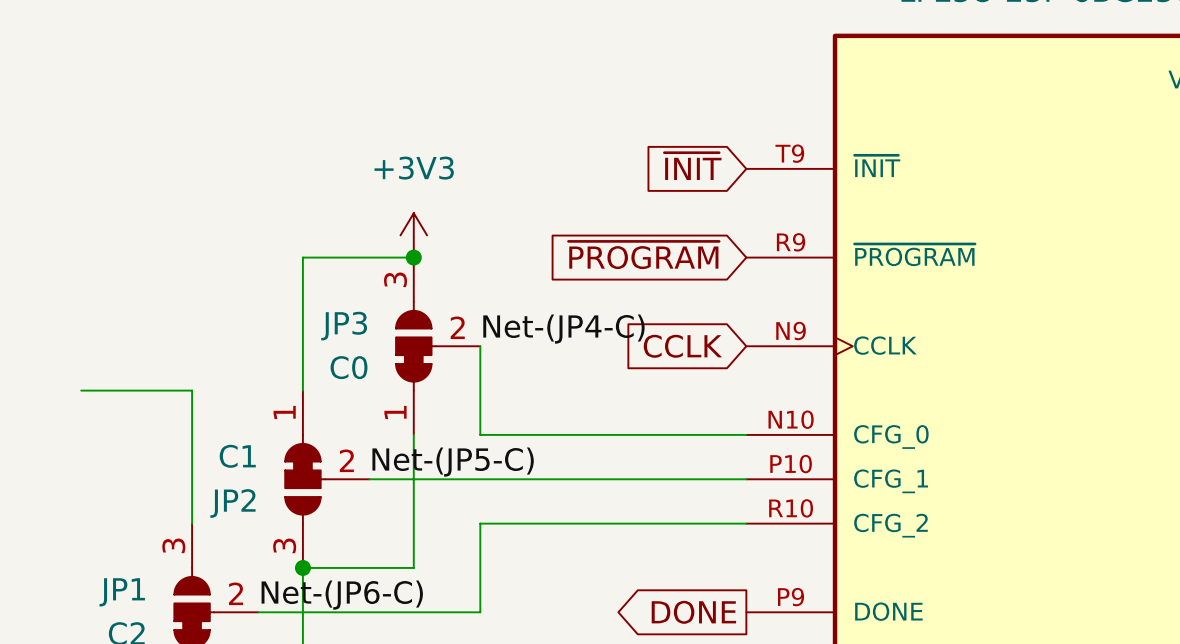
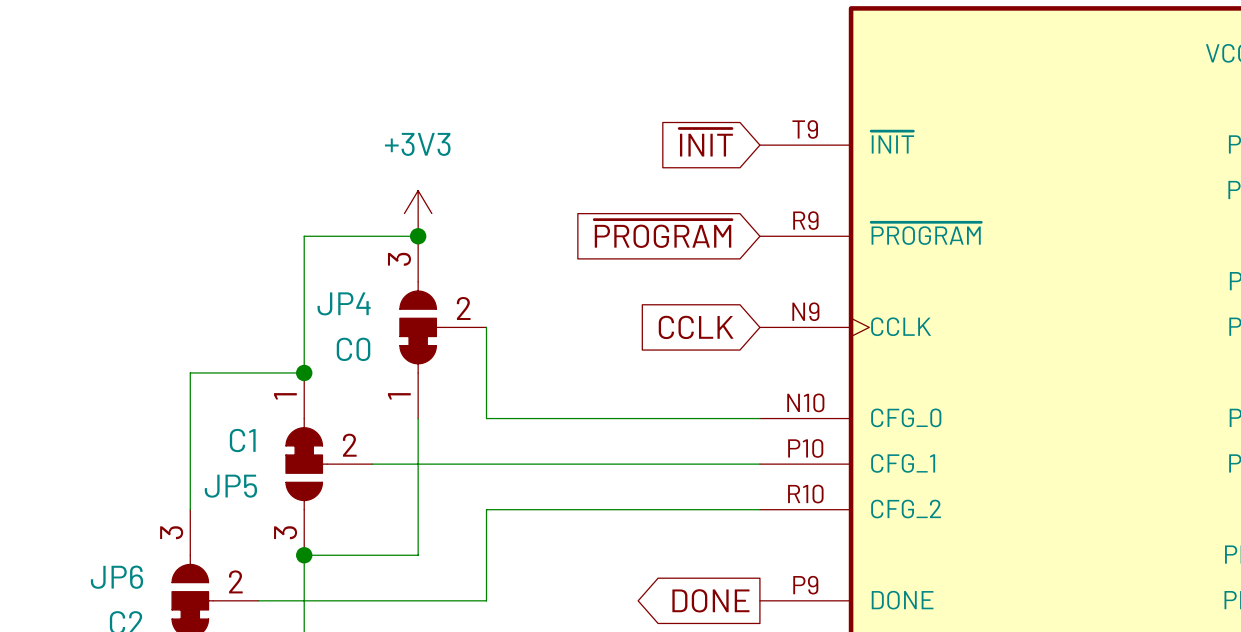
JP3 name: JP3 (344, 326) -> JP4 (344, 303)
label: Net-(JP4-C) (563, 329) -> none
wire: (81, 390) (192, 390) -> (304, 372) (190, 372)
junction: none -> (304, 372)
label: Net-(JP5-C) (453, 462) -> none
JP2 name: JP2 (232, 503) -> JP5 (230, 486)
JP1 name: JP1 (122, 592) -> JP6 (116, 577)
label: Net-(JP6-C) (342, 595) -> none

